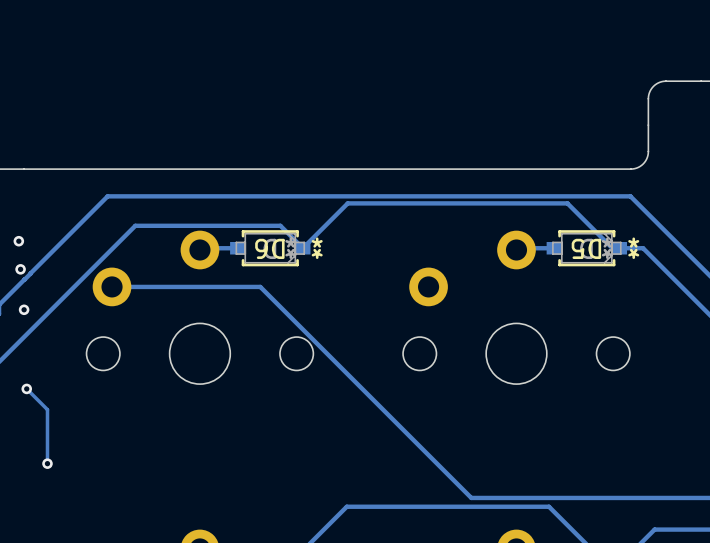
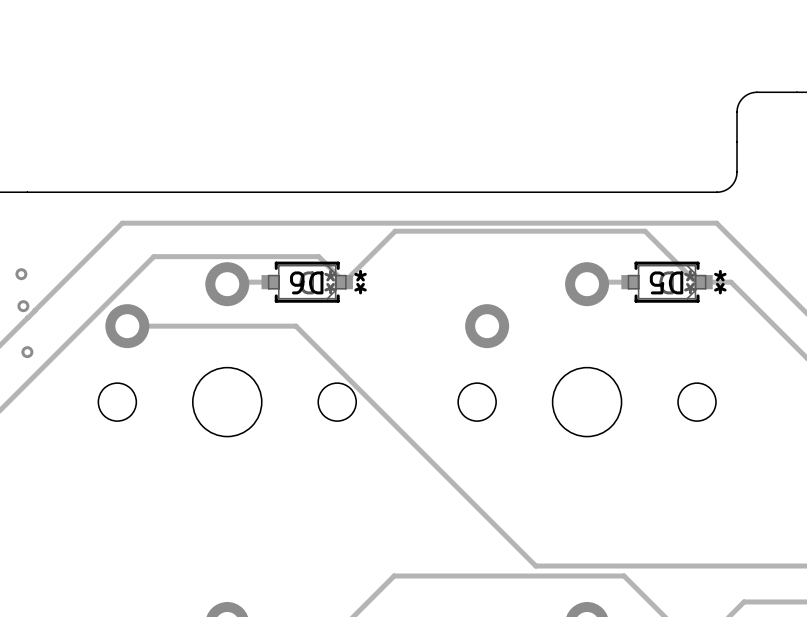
track: (26, 388) (47, 409) (47, 463) -> none
via: (26, 388) -> none
via: (47, 463) -> none

